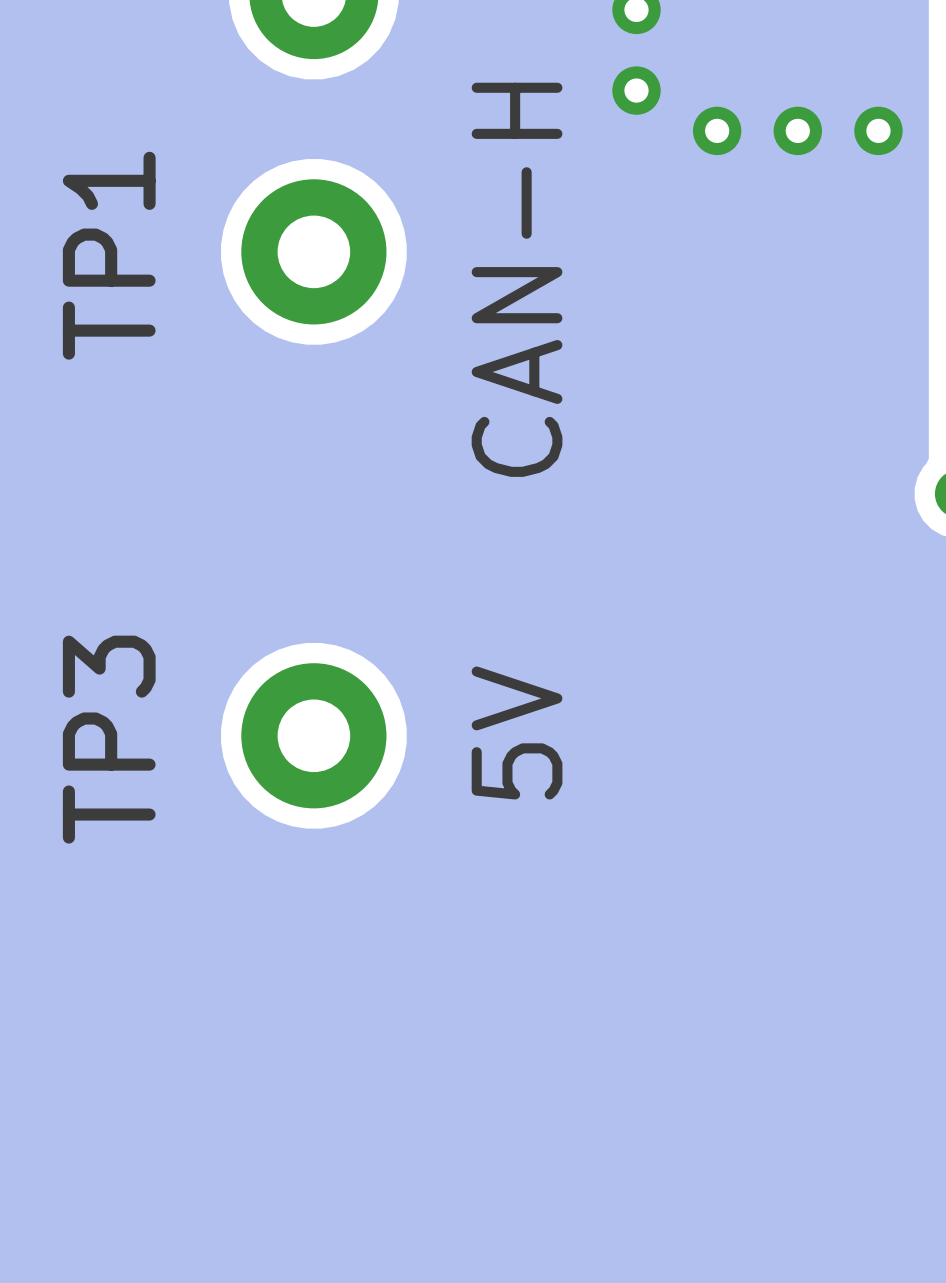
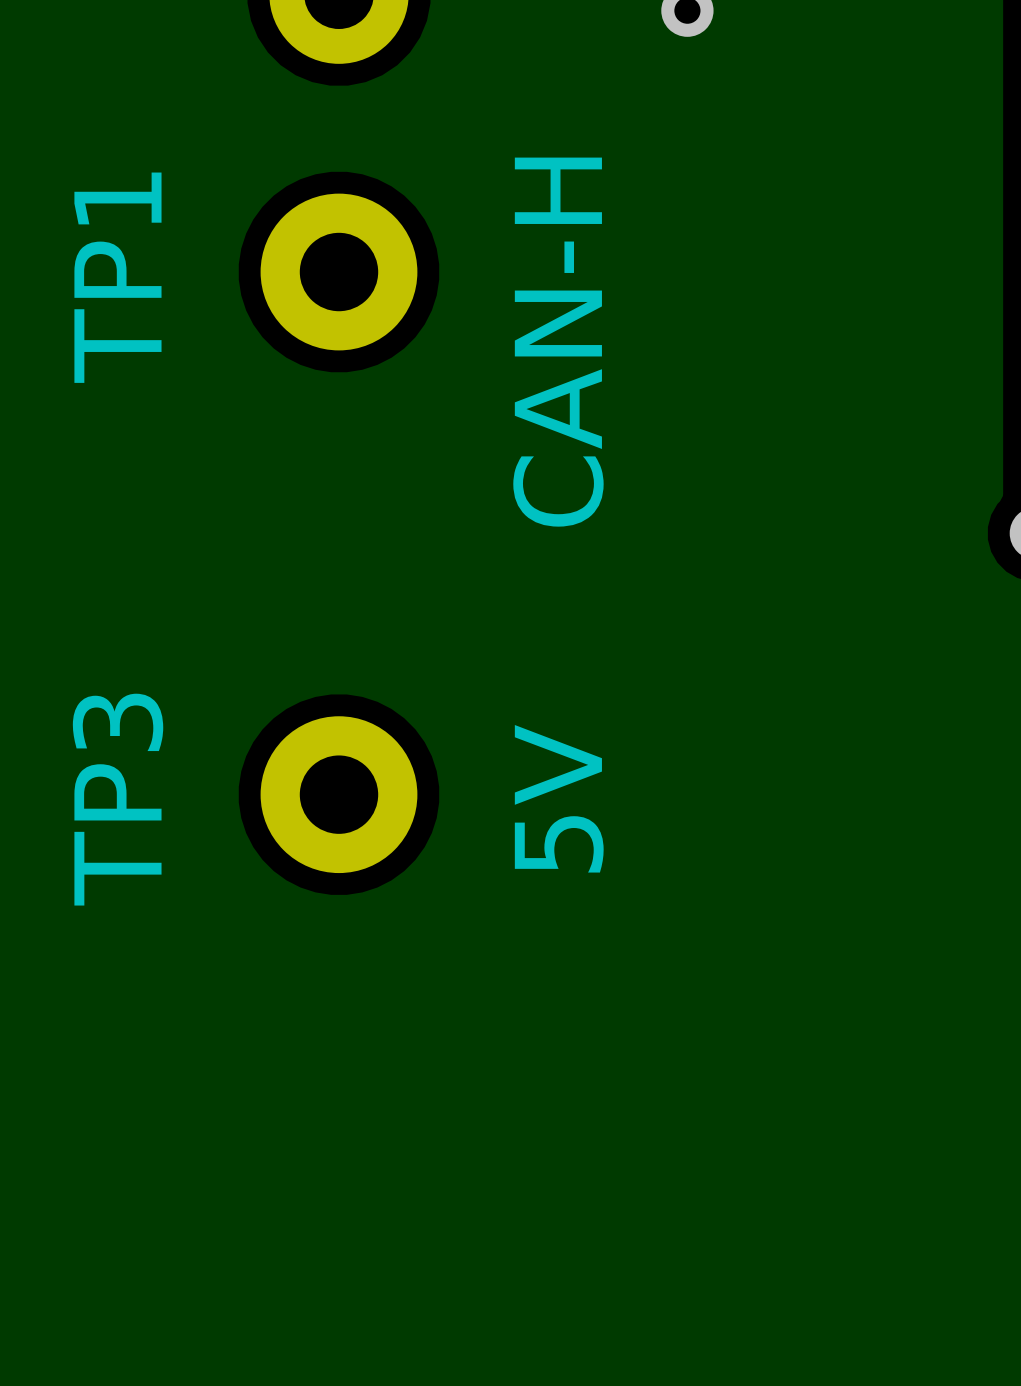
via: (636, 90) -> none
via: (717, 130) -> none
via: (797, 130) -> none
via: (878, 130) -> none

